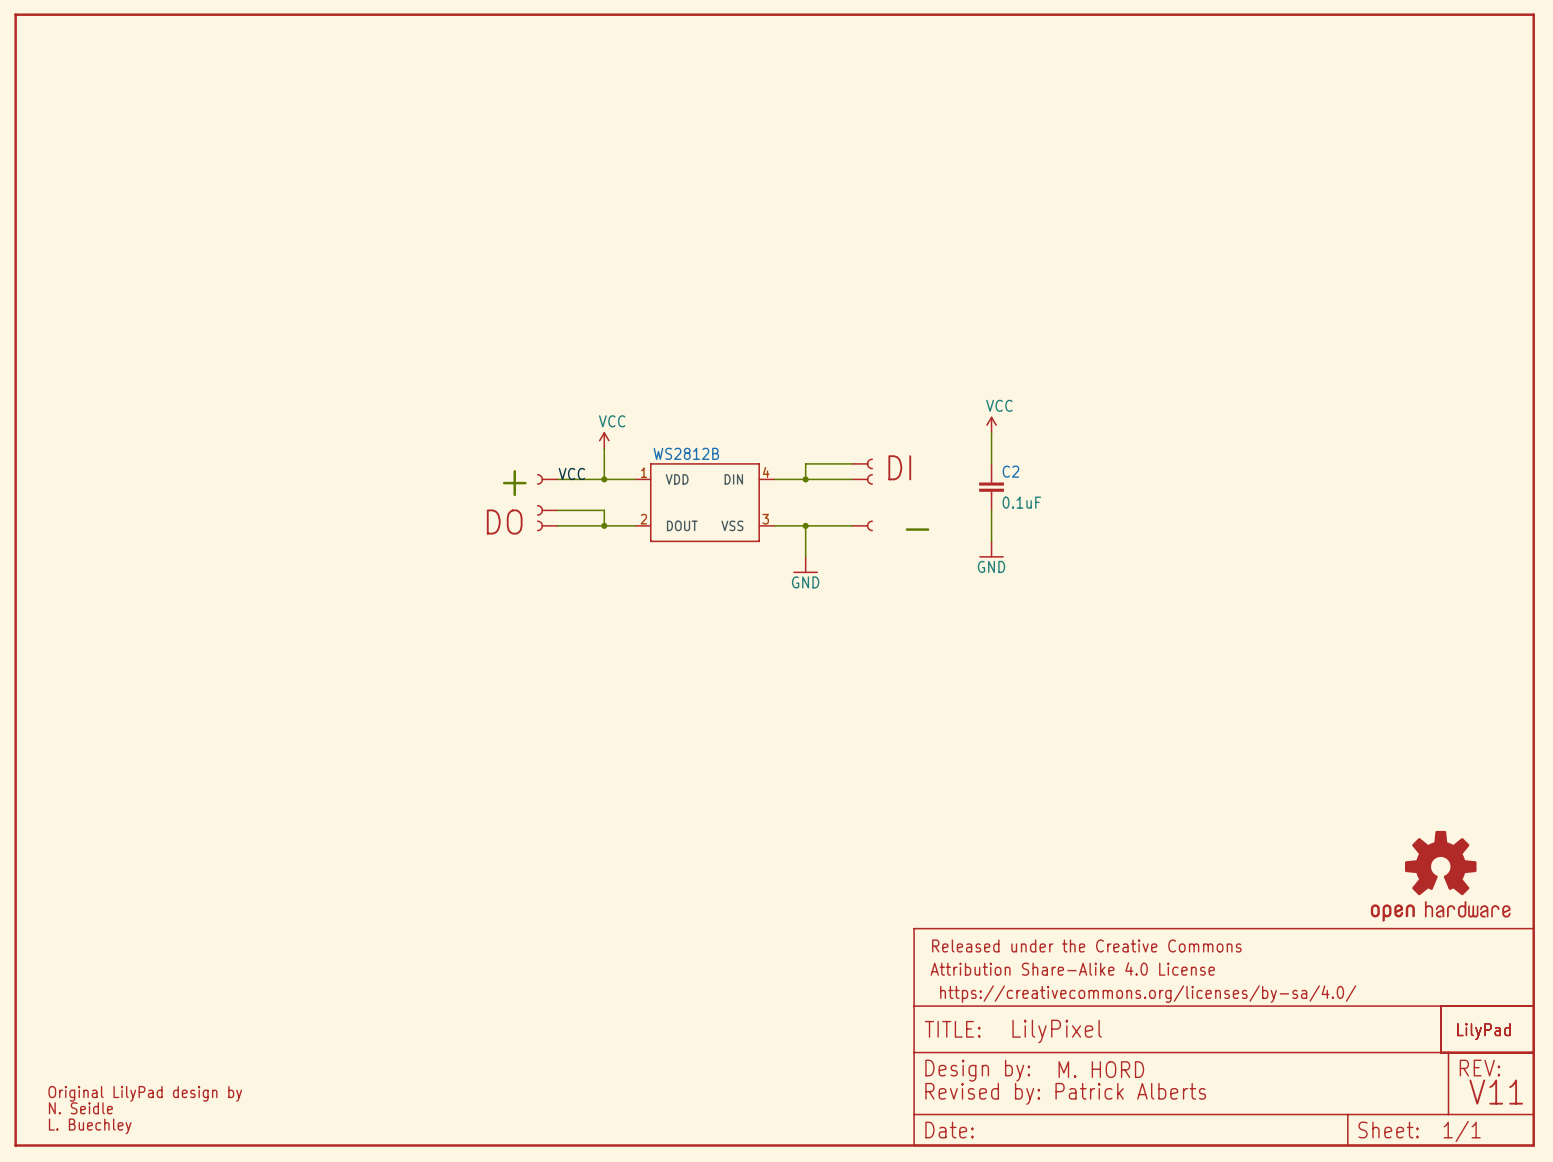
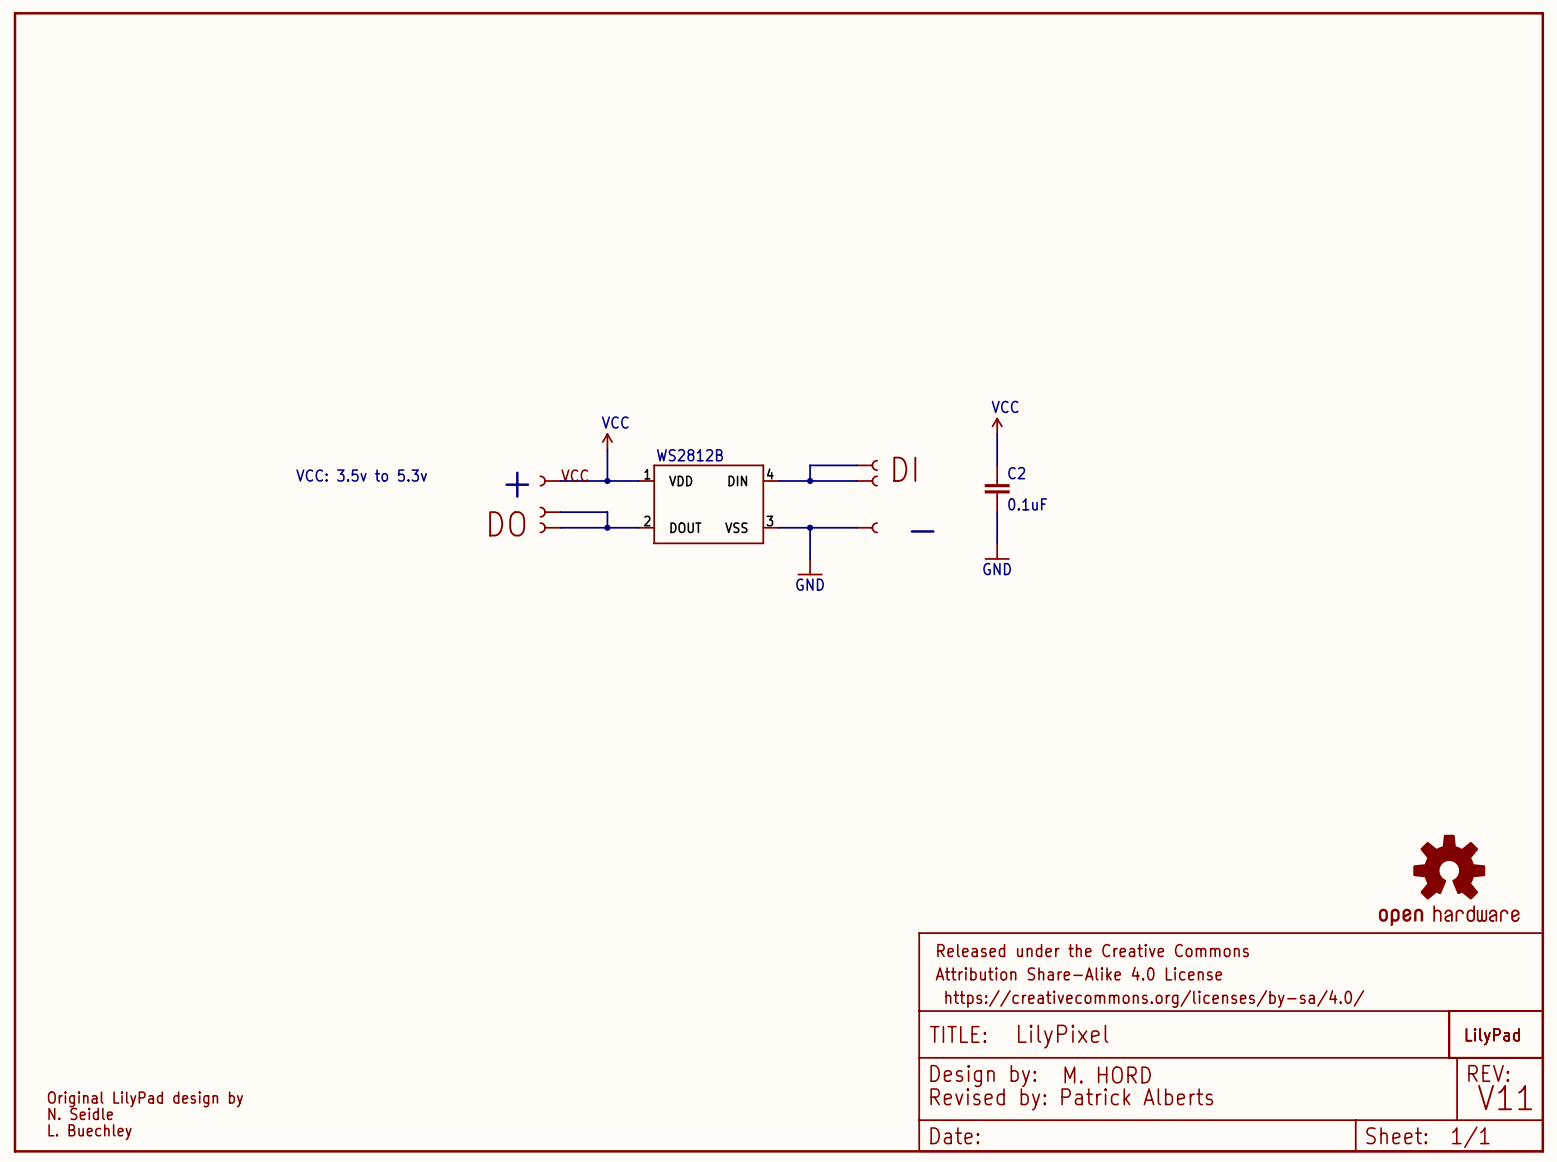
text: none -> VCC: 3.5v to 5.3v (361, 475)

